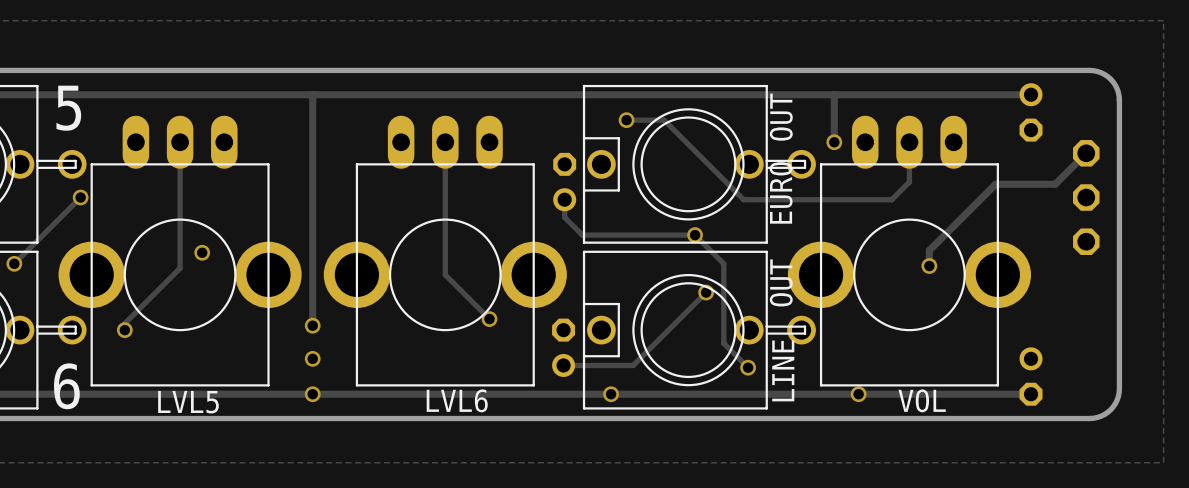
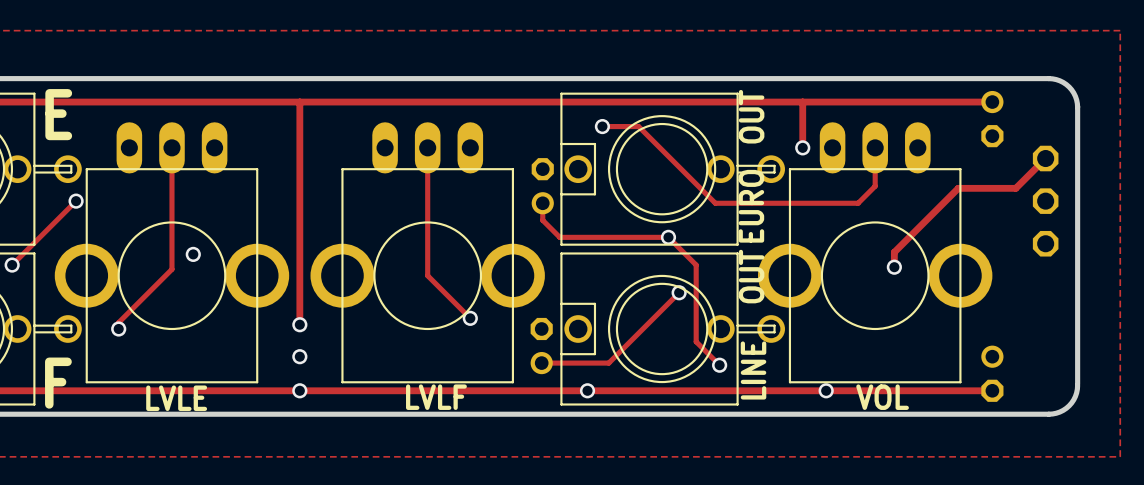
5 name: 5 (68, 108) -> E (58, 114)
6 name: 6 (66, 386) -> F (58, 383)
LVL6 name: LVL6 (457, 400) -> LVLF (436, 397)
LVL5 name: LVL5 (188, 402) -> LVLE (176, 398)

